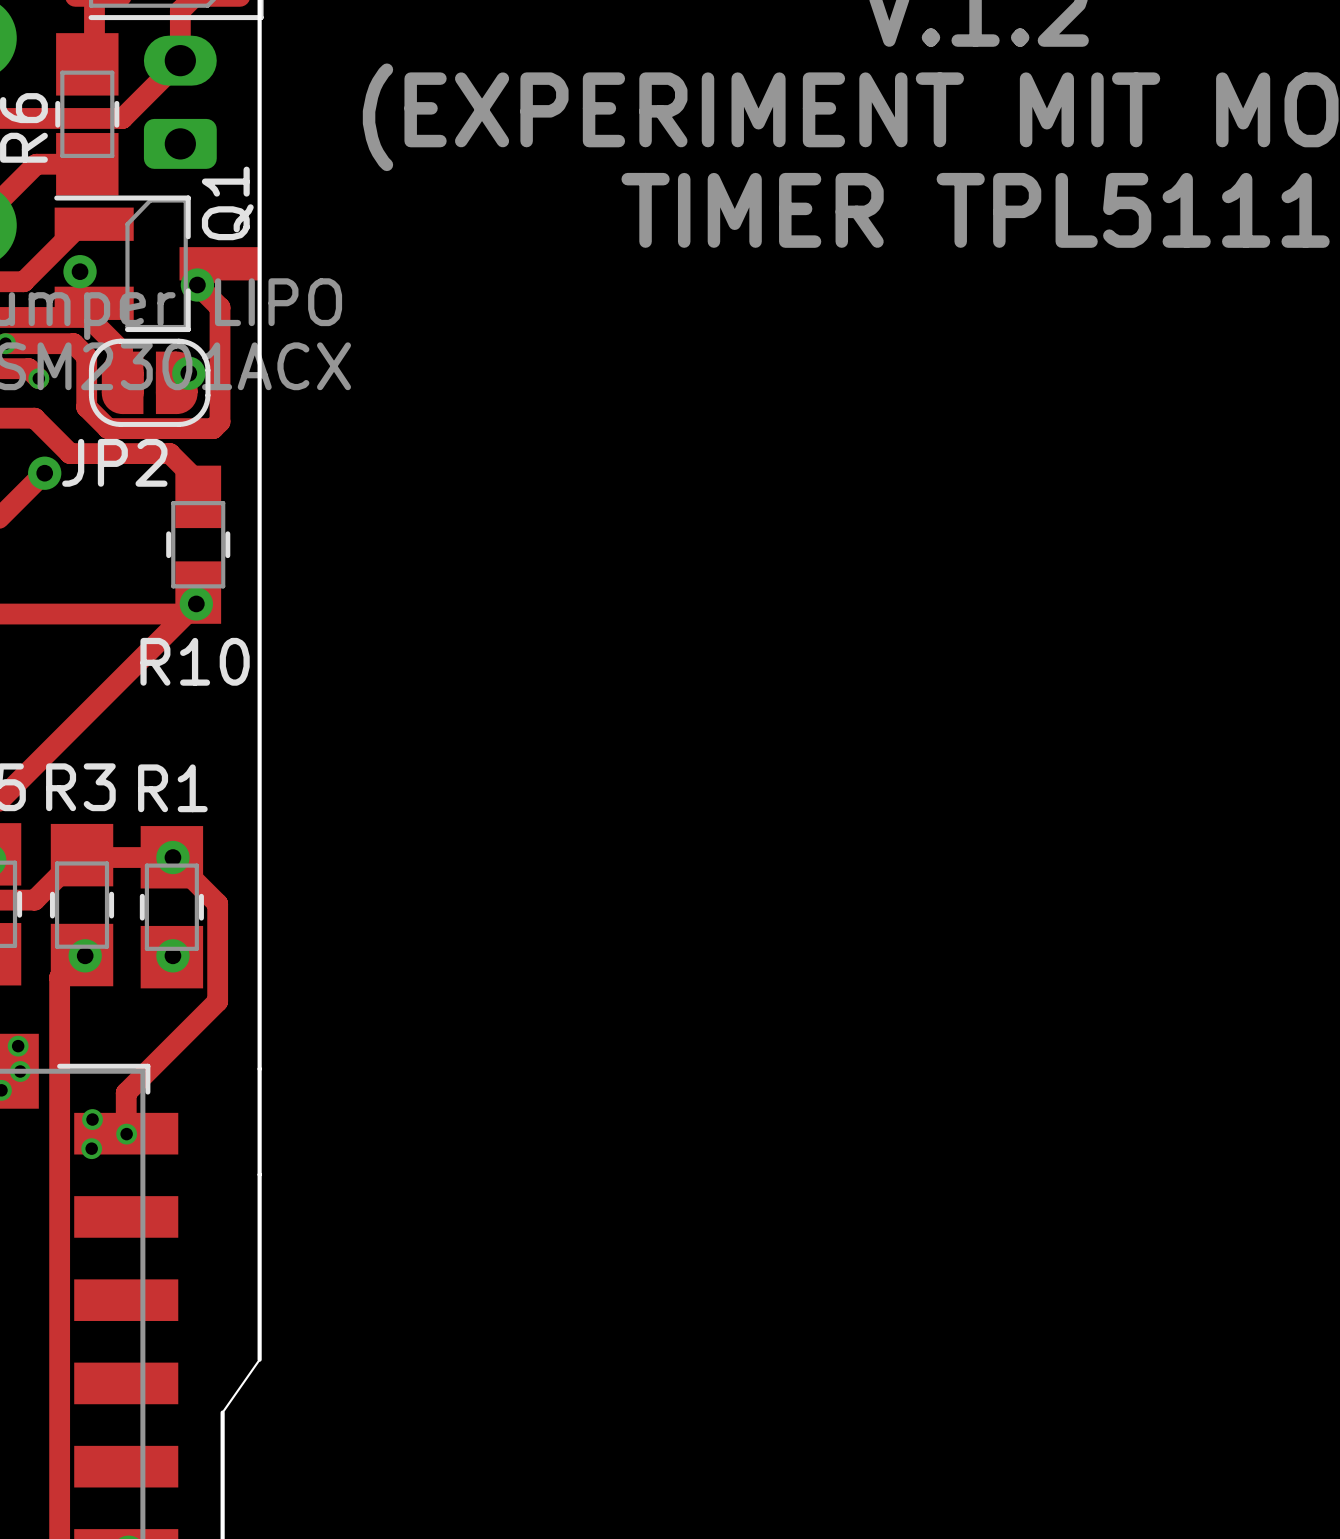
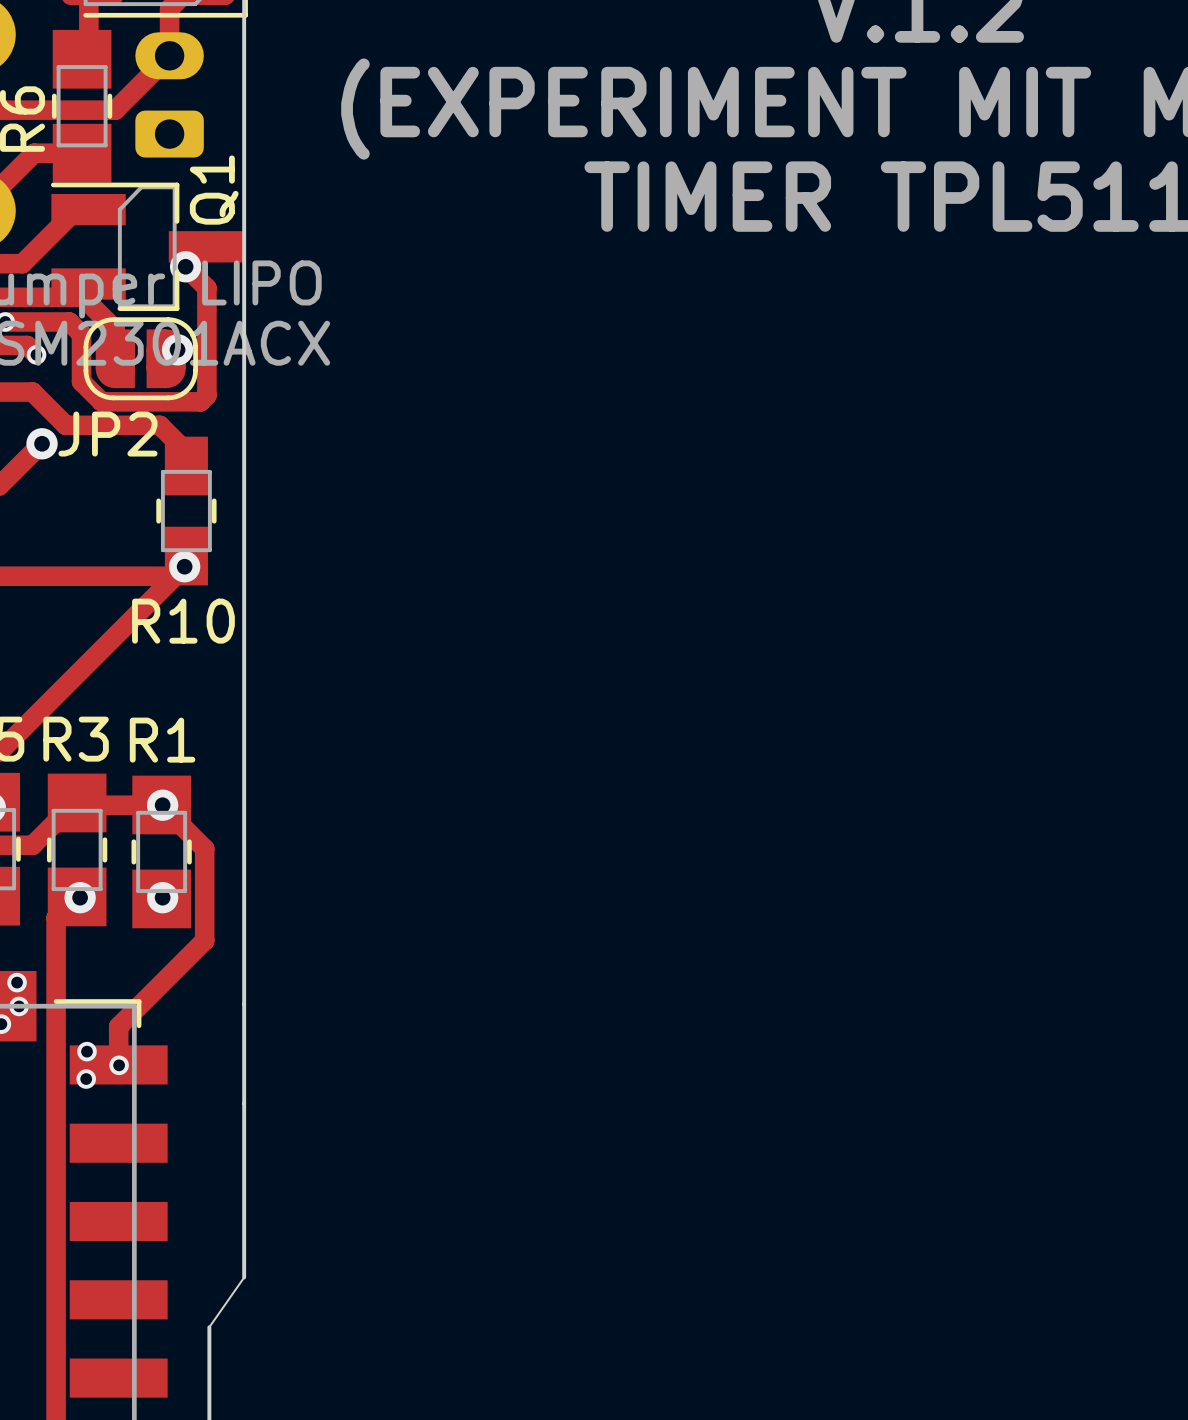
via: (80, 271) -> none

